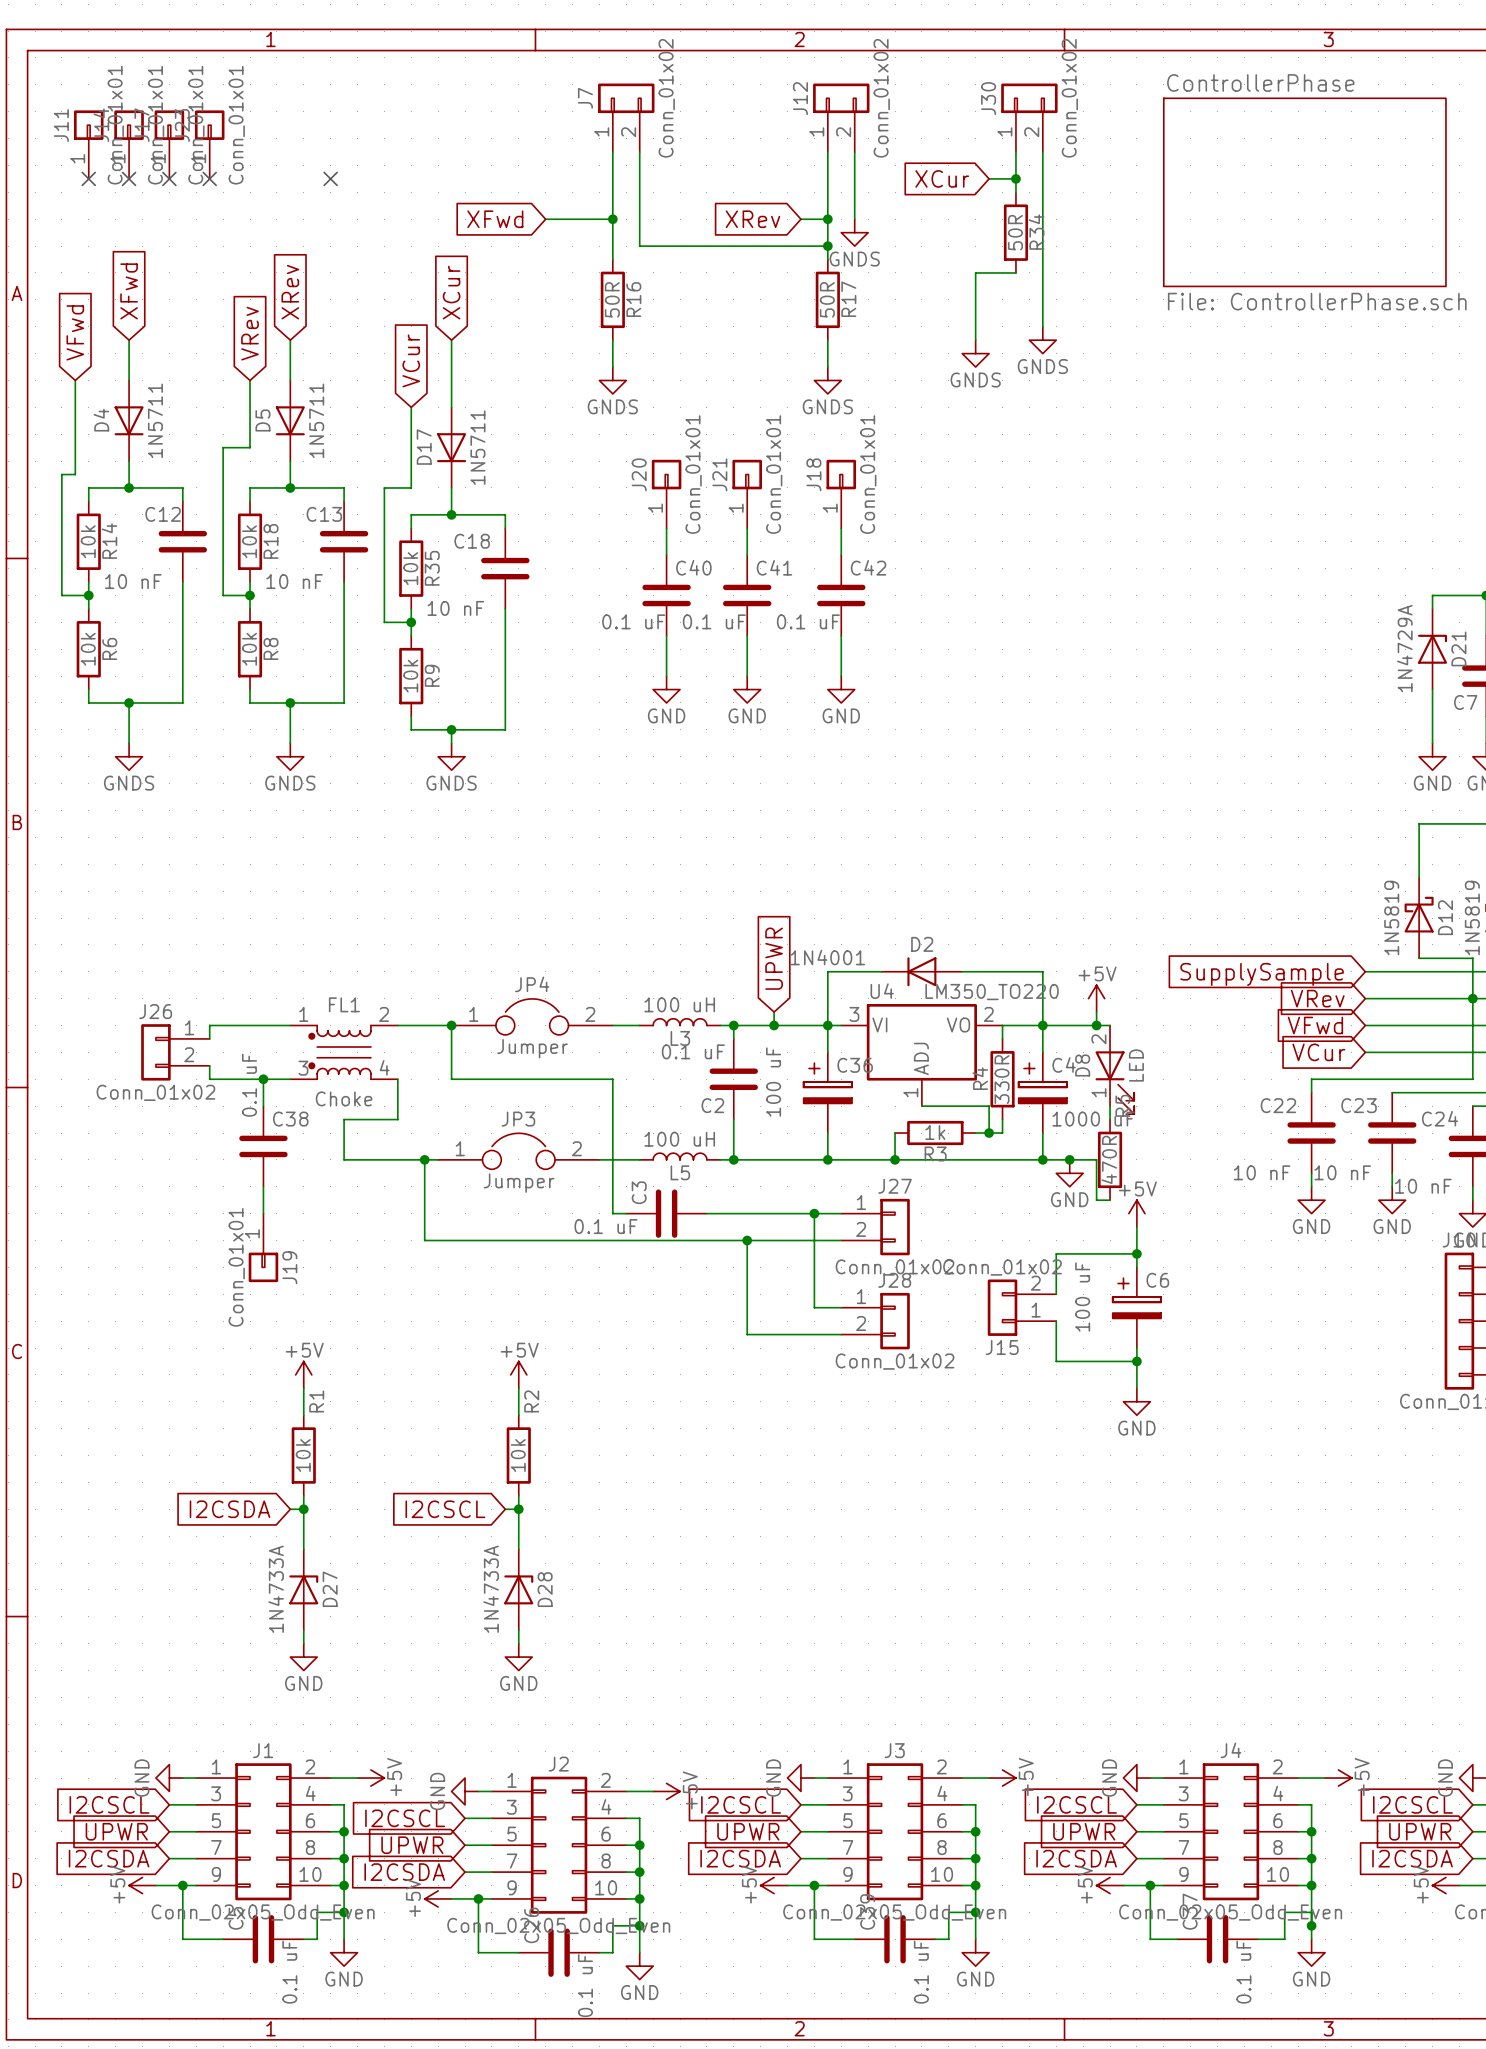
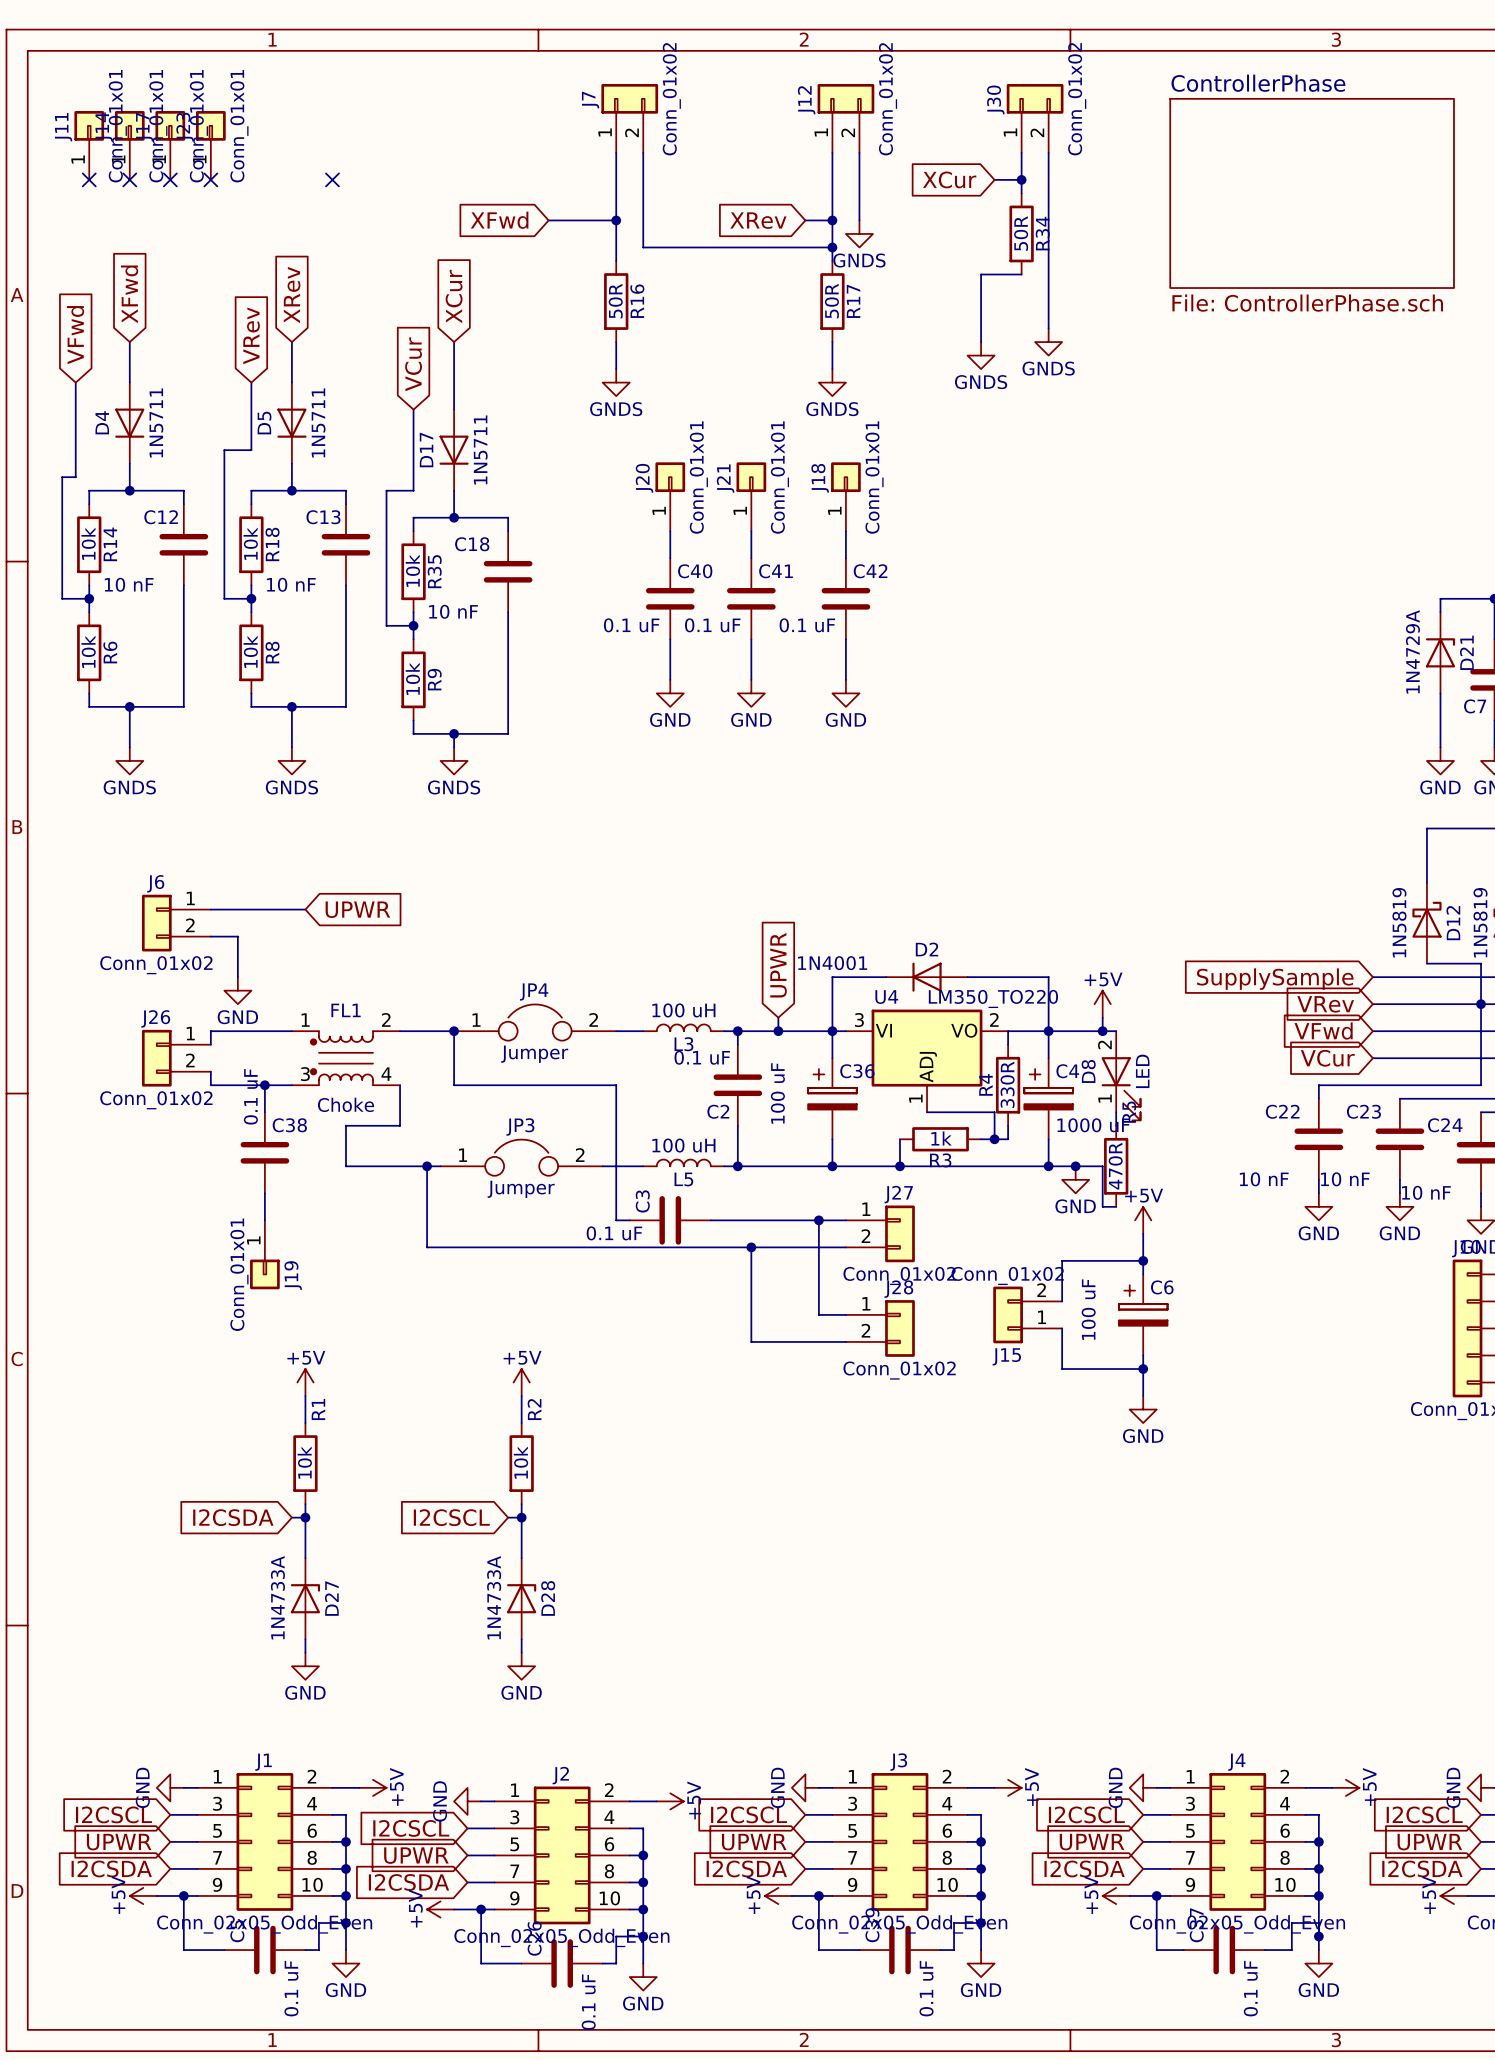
wire: none -> (210, 909) (305, 909)
global label: none -> UPWR (357, 909)
J6: none -> Conn_01x02 (176, 923)
wire: none -> (210, 936) (237, 936) (237, 977)
power symbol: none -> GND (237, 990)

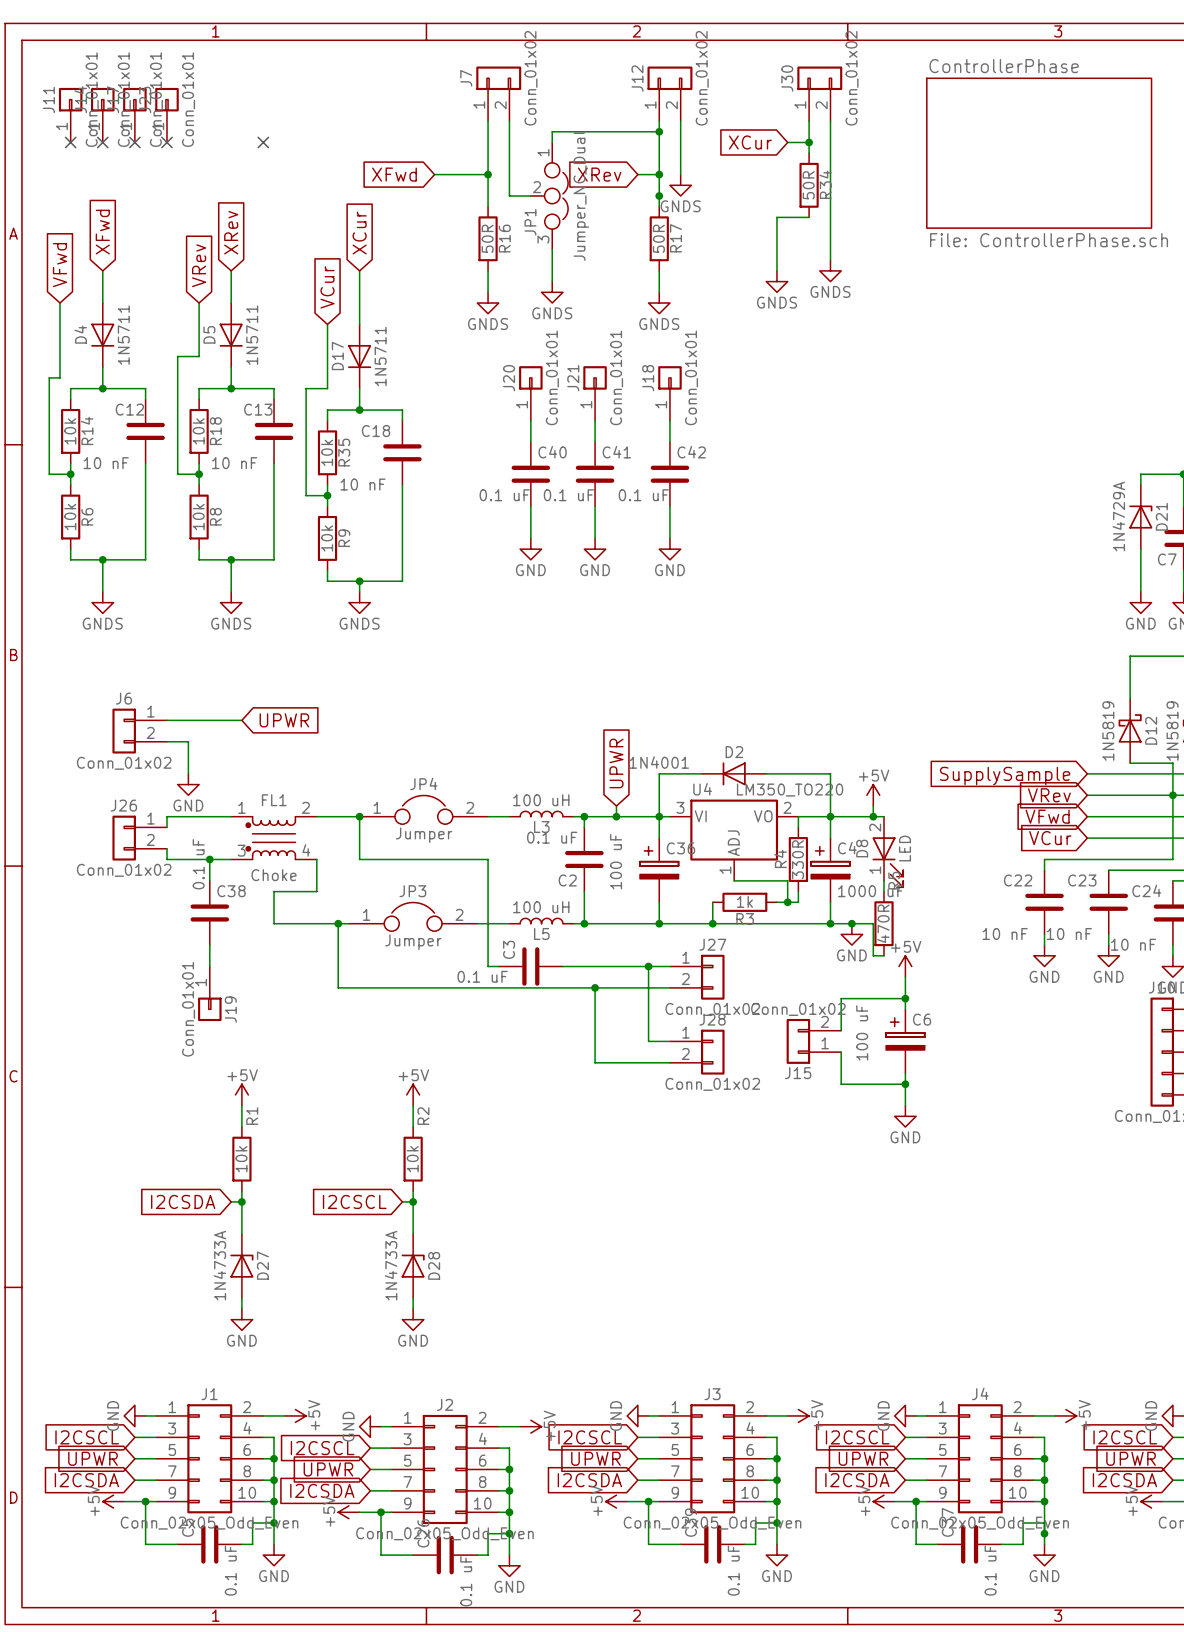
wire: none -> (659, 131) (552, 131) (552, 142)
junction: none -> (659, 131)
wire: (670, 247) (832, 247) -> none
JP1: none -> Jumper_NC_Dual (549, 196)
wire: none -> (552, 249) (552, 281)
power symbol: none -> GNDS (552, 292)

